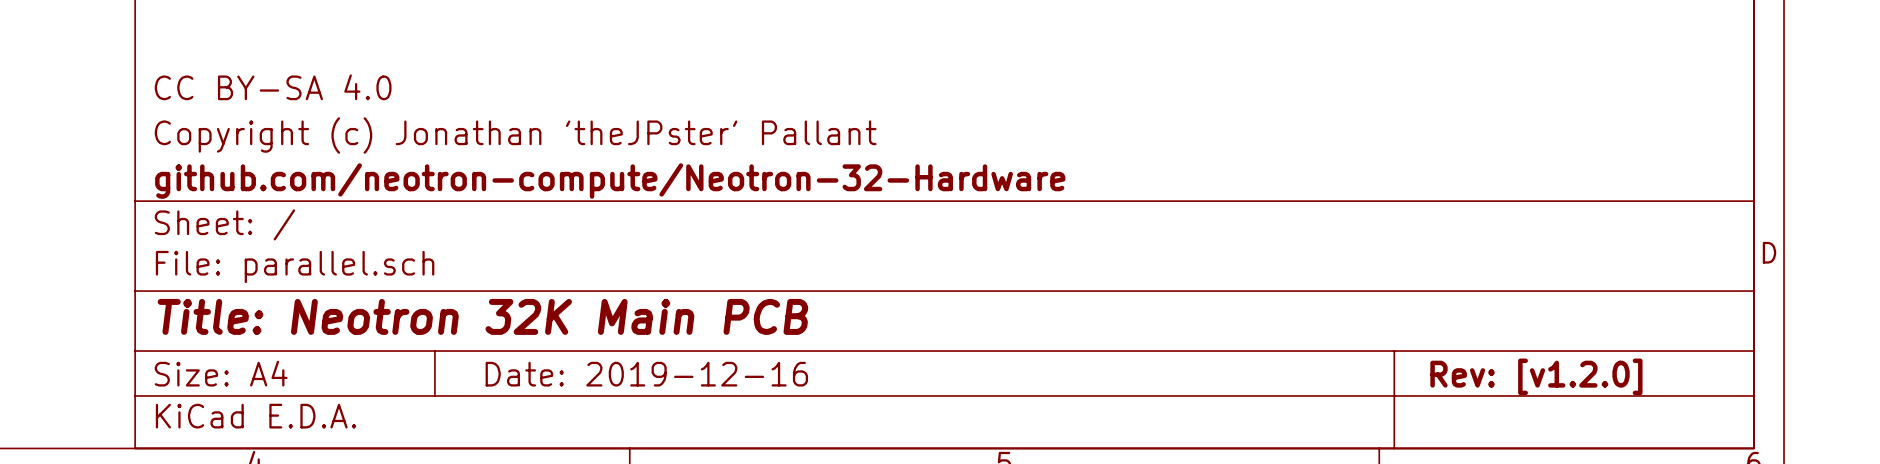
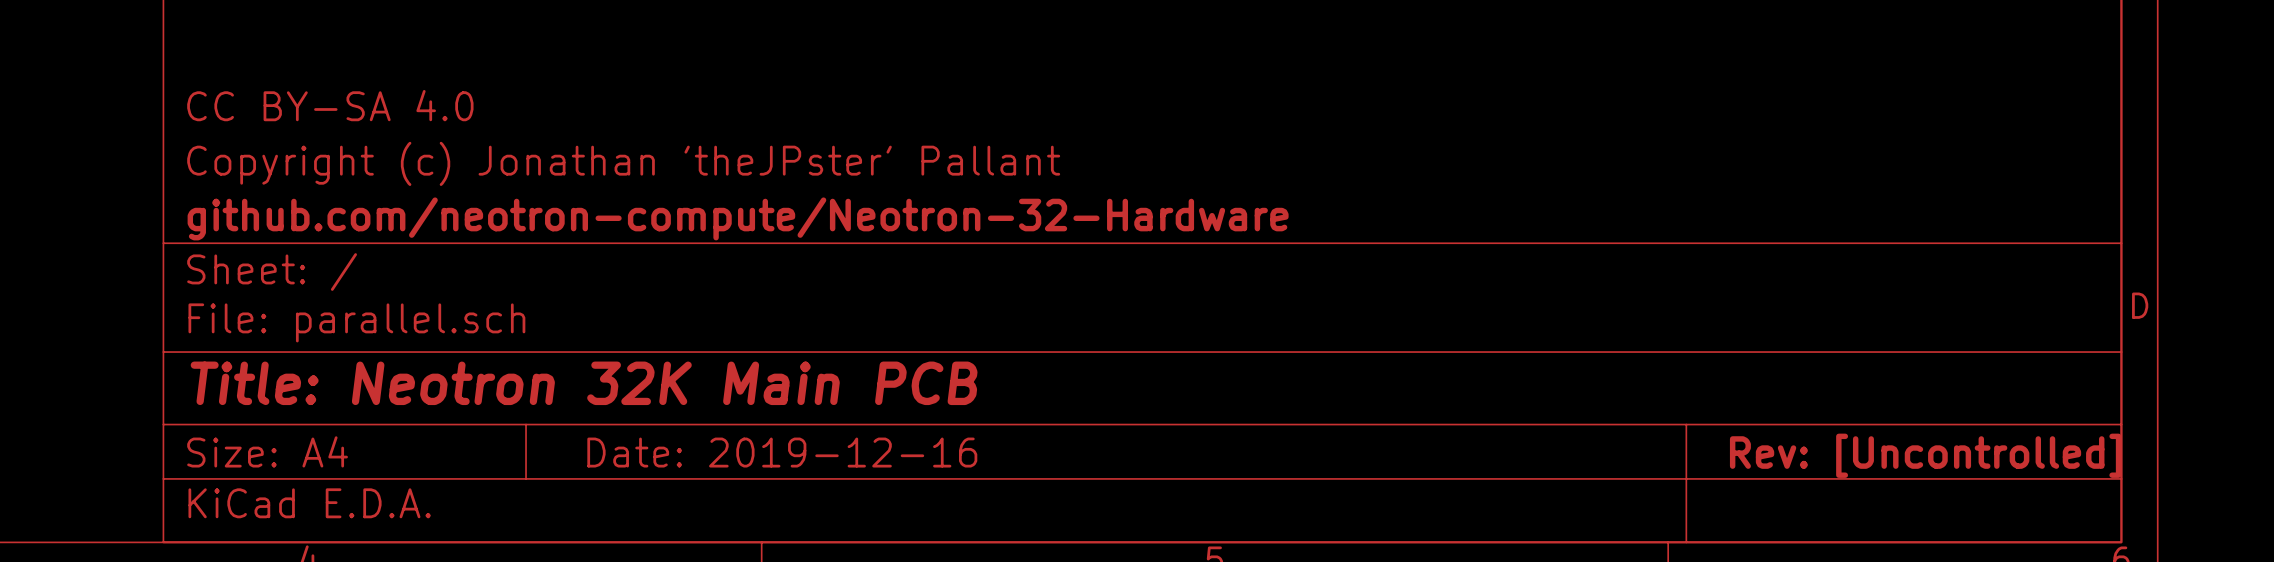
title block: Rev: [v1.2.0] (1536, 376) -> Rev: [Uncontrolled] (1925, 455)

